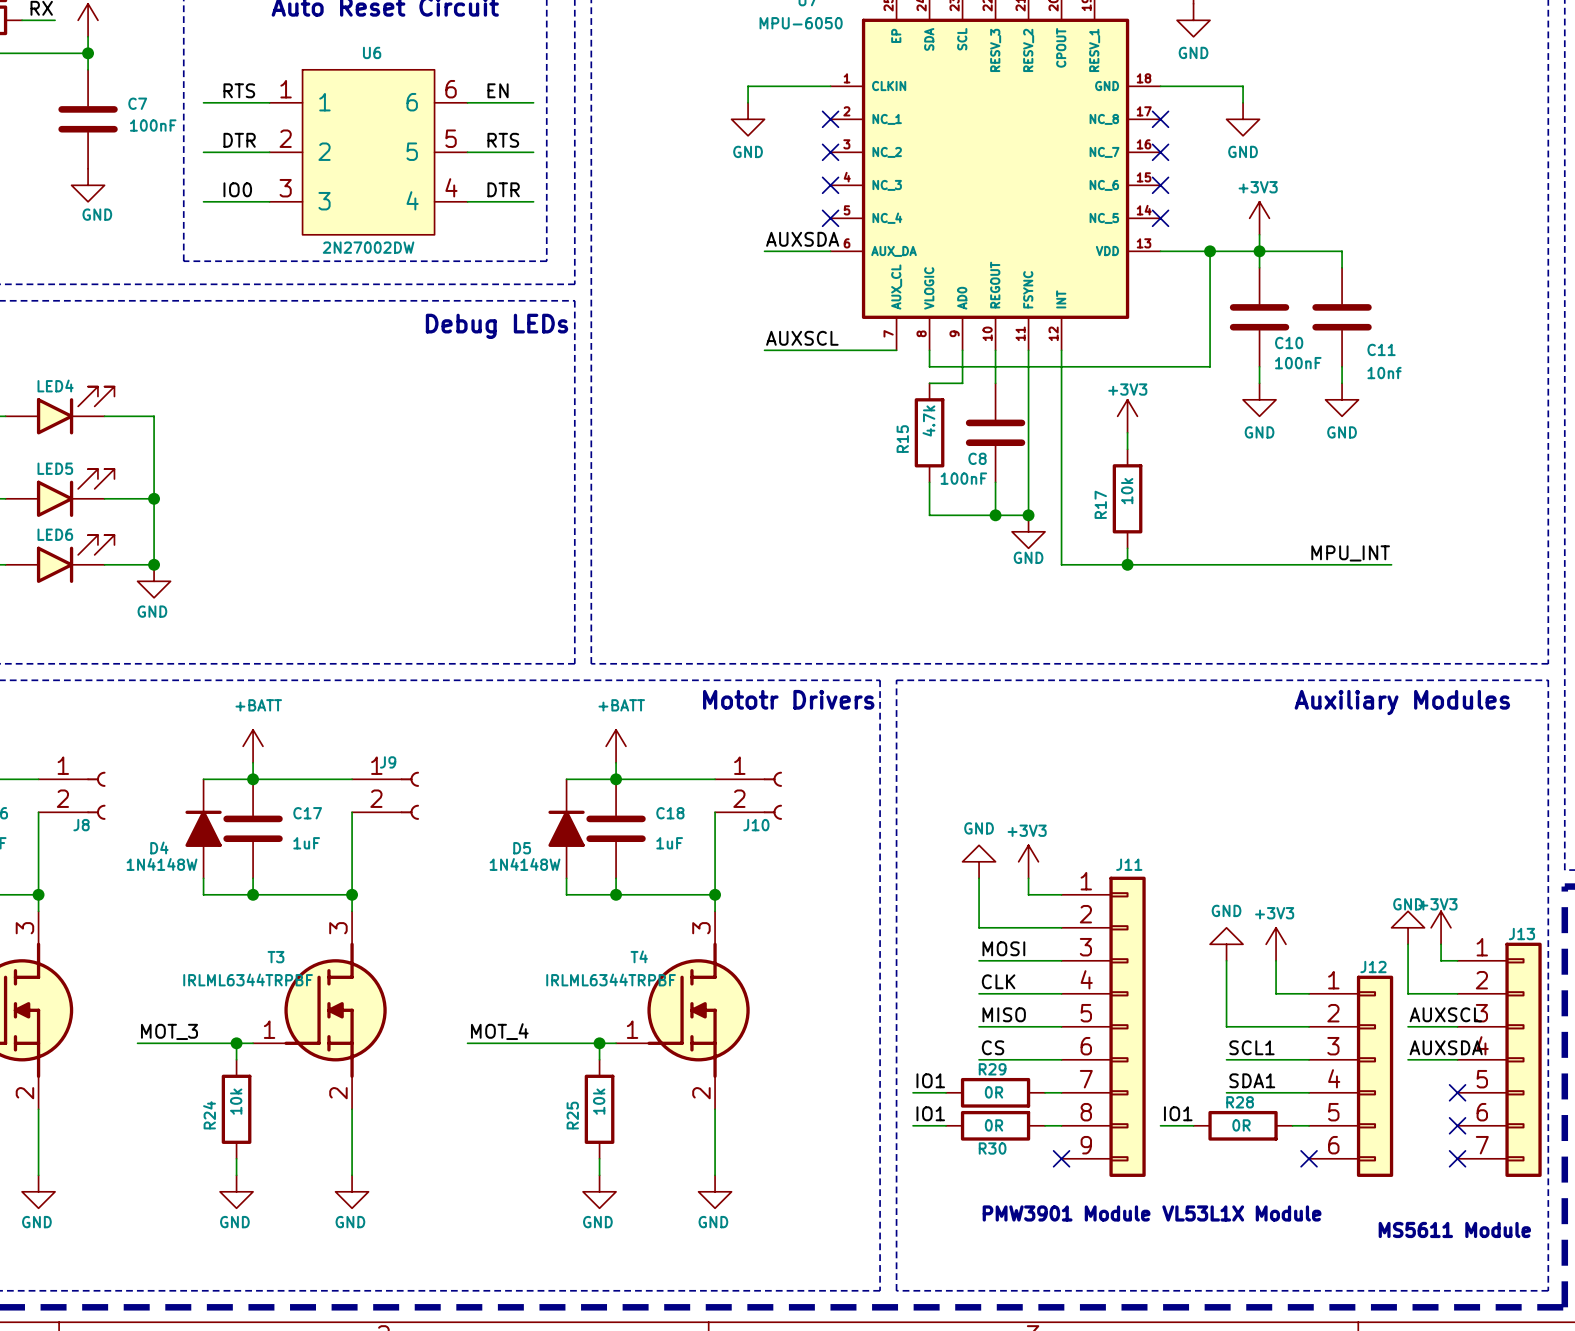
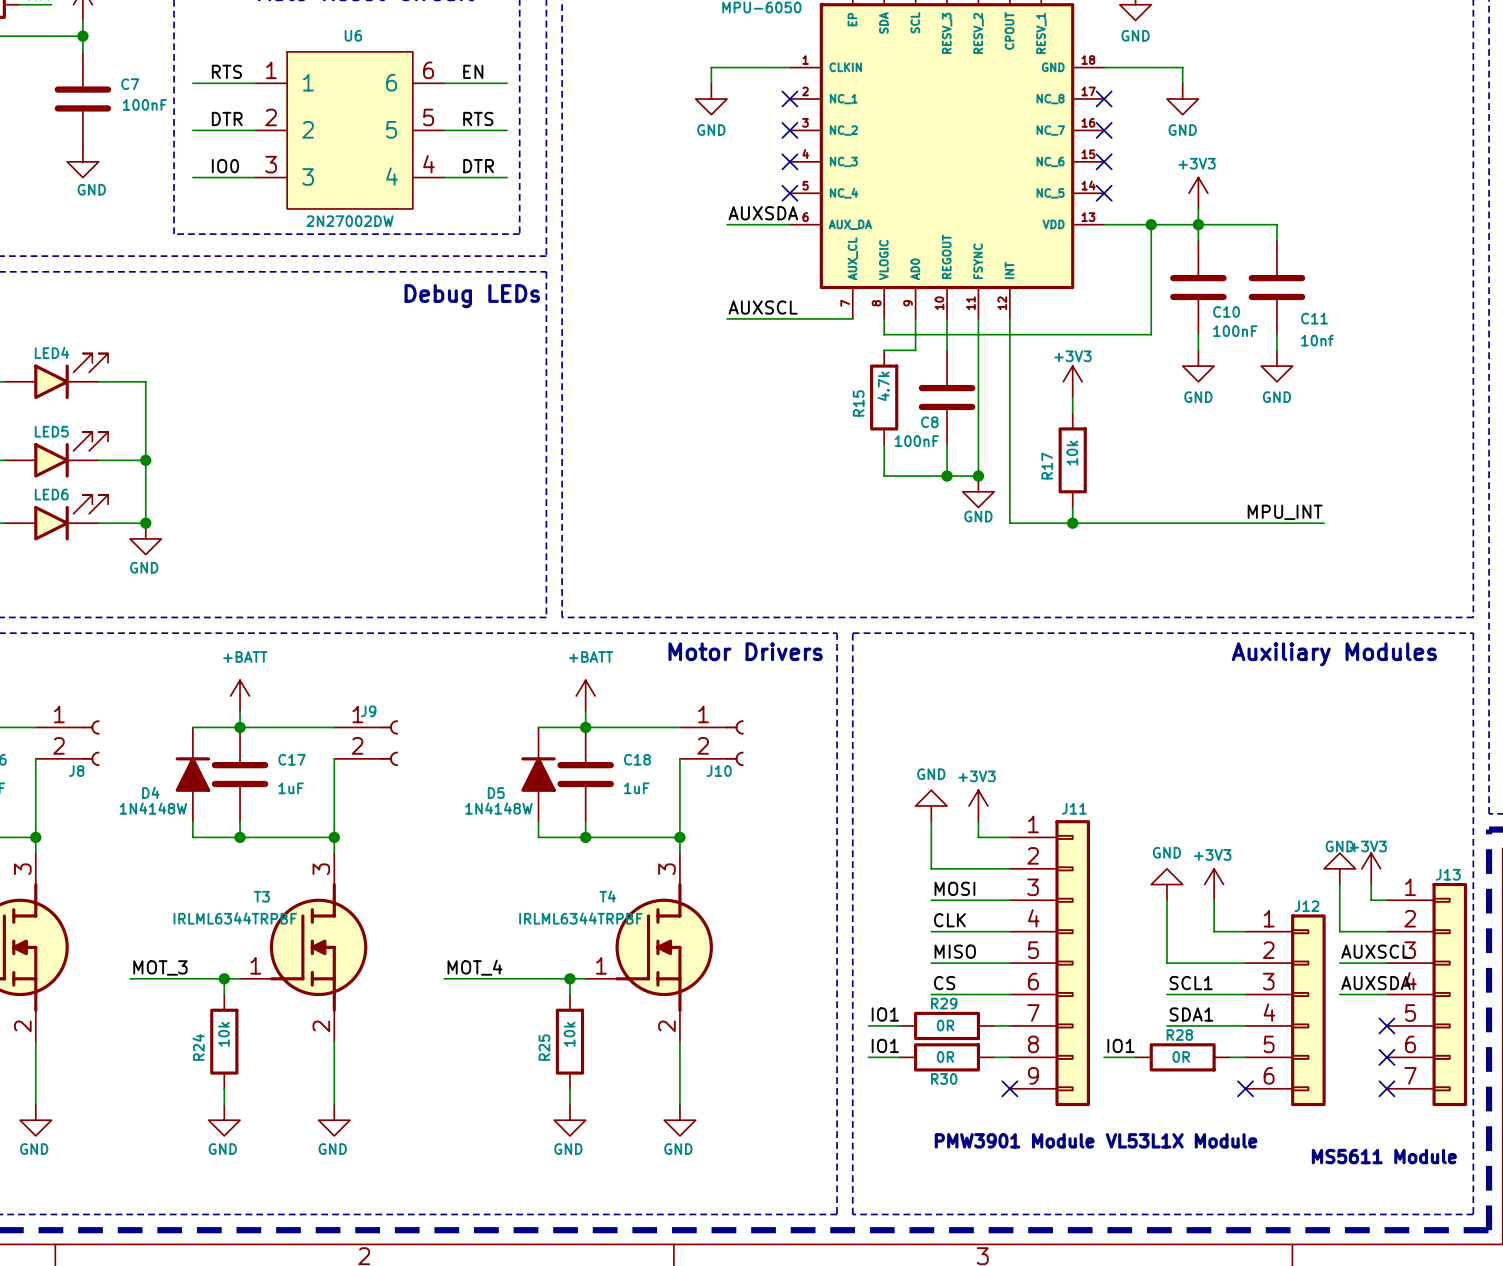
text: Mototr Drivers (788, 699) -> Motor Drivers (745, 651)

